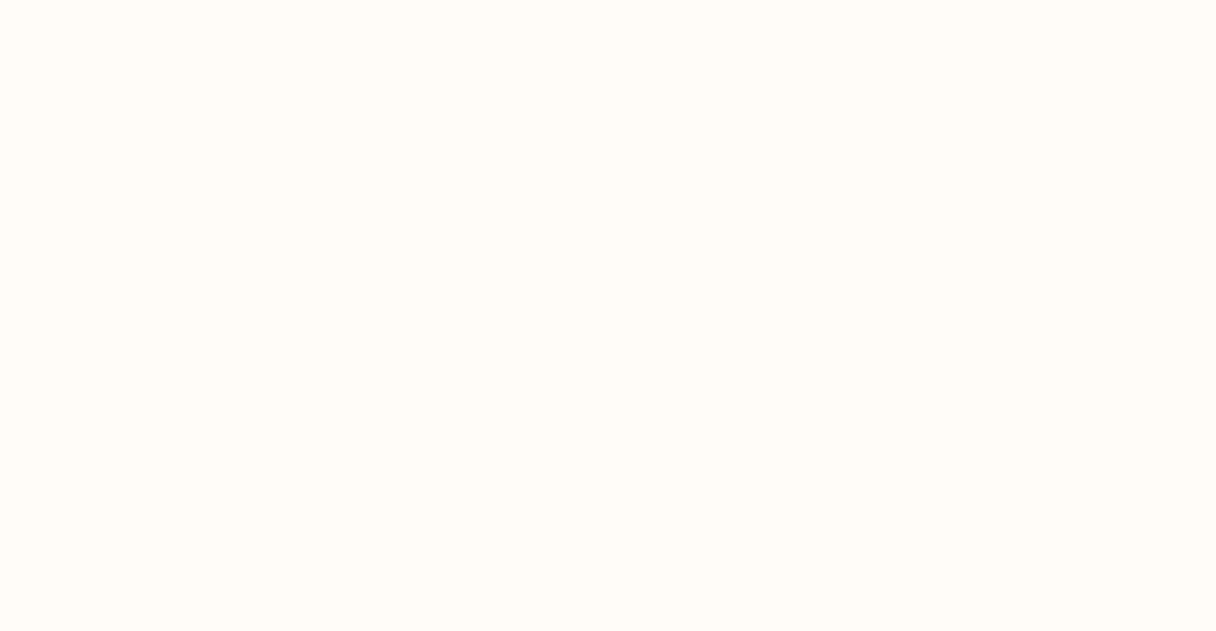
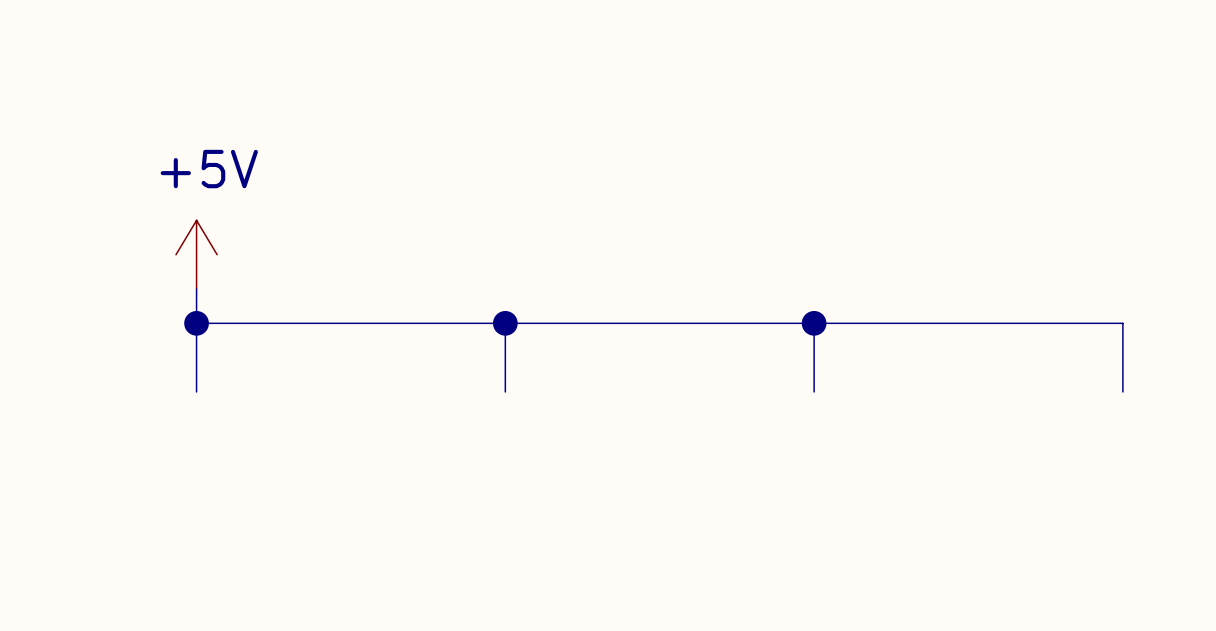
power symbol: none -> +5V (196, 254)
wire: none -> (196, 289) (196, 391)
wire: none -> (196, 323) (1122, 323) (1122, 391)
junction: none -> (196, 323)
wire: none -> (505, 323) (505, 391)
junction: none -> (505, 323)
wire: none -> (814, 323) (814, 391)
junction: none -> (814, 323)

